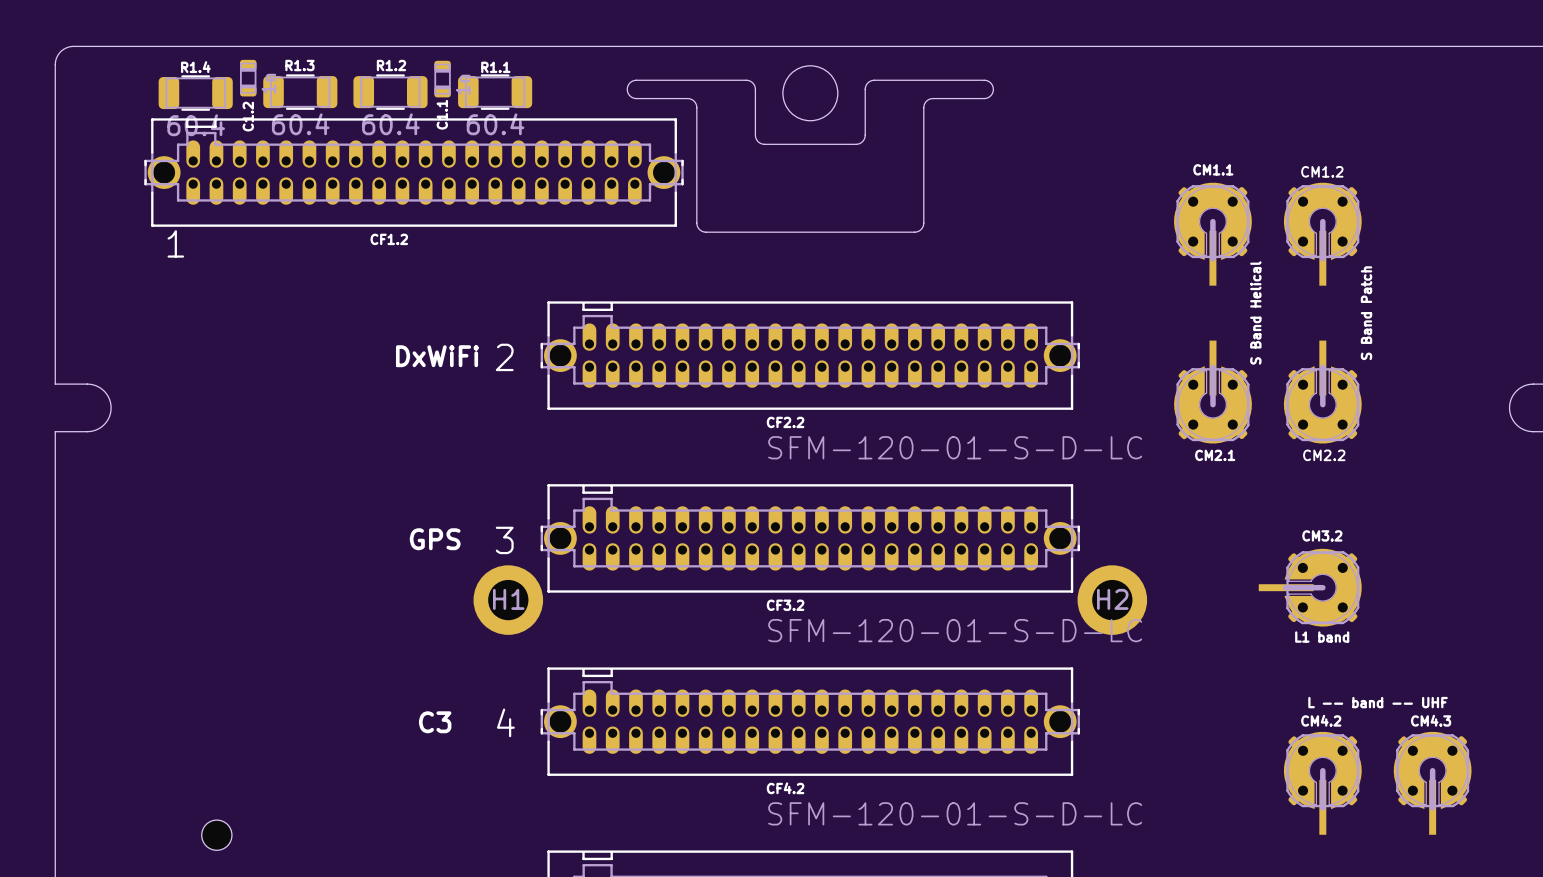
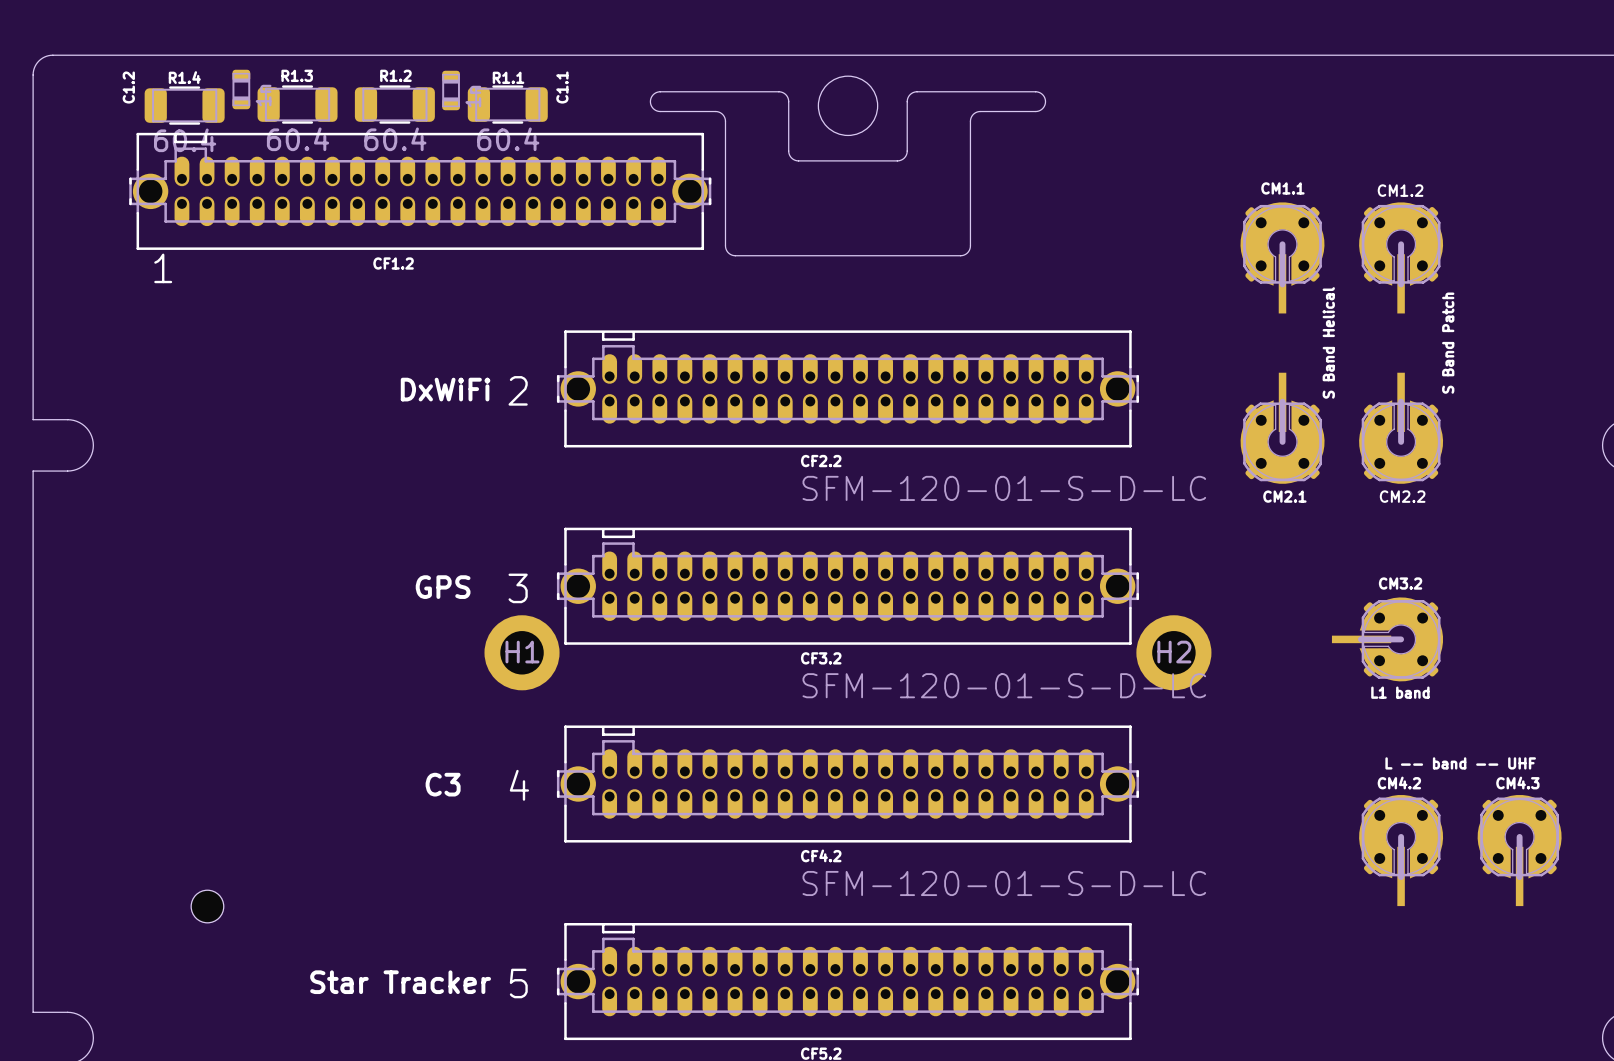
C1.1 name position: C1.1 (442, 114) -> C1.1 (562, 87)
C1.2 name position: C1.2 (248, 116) -> C1.2 (128, 87)

